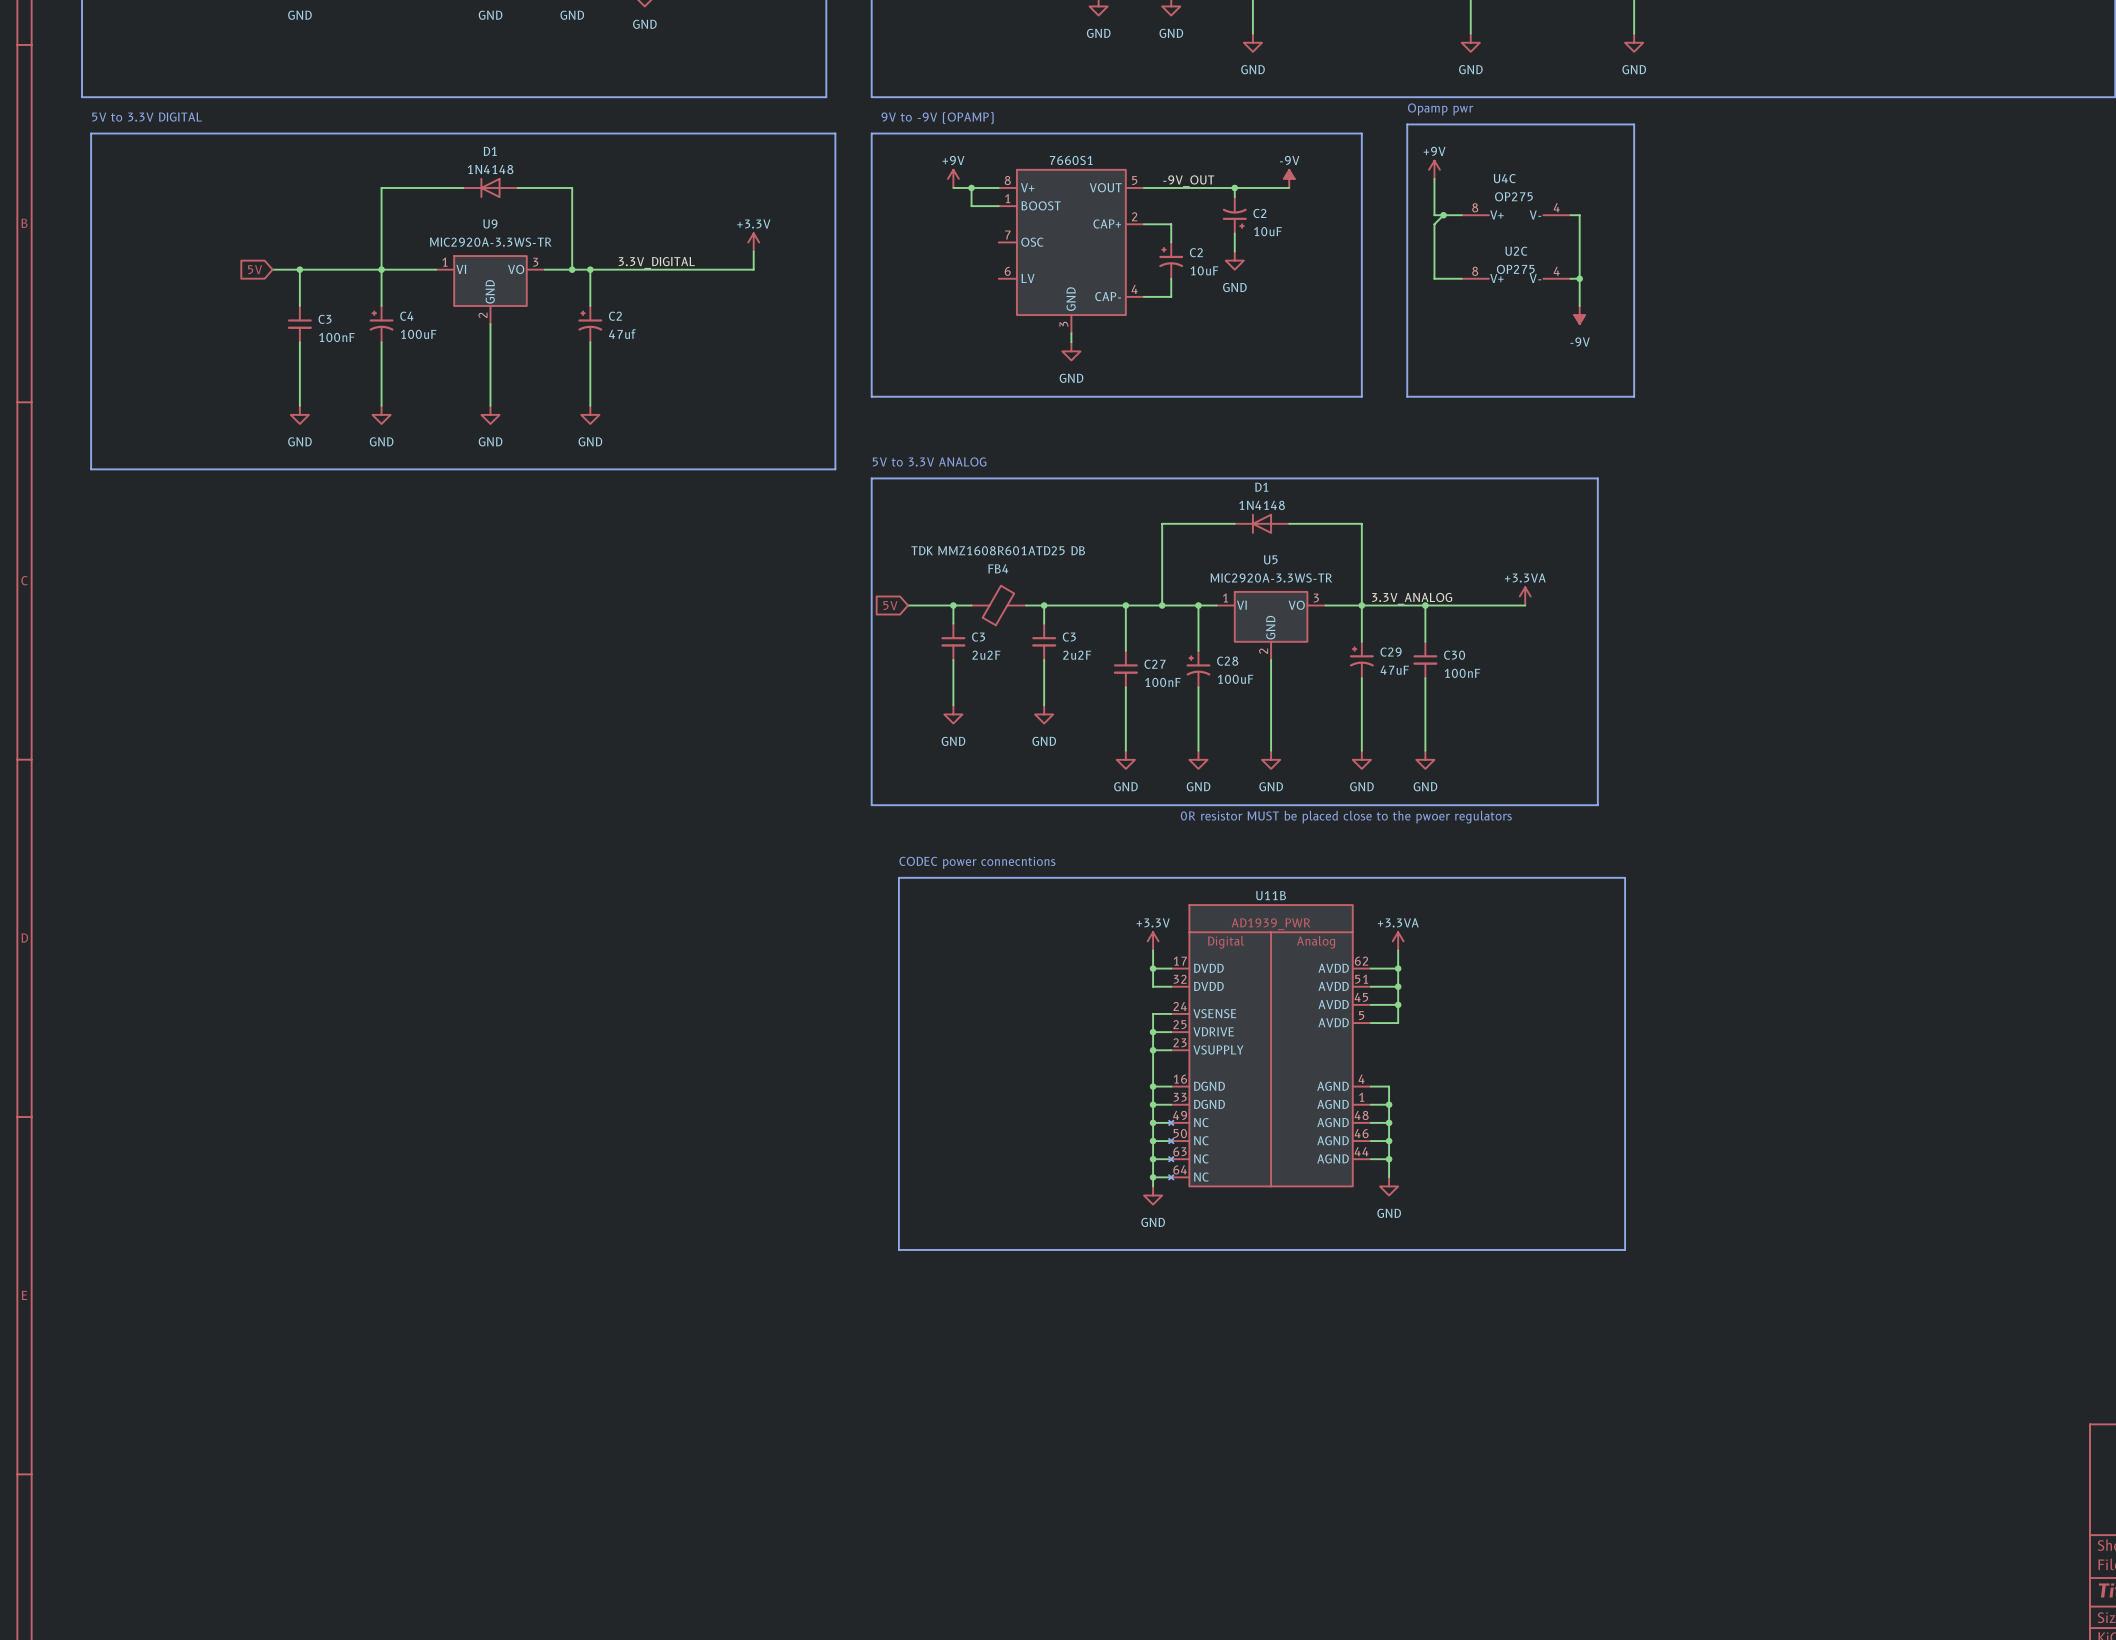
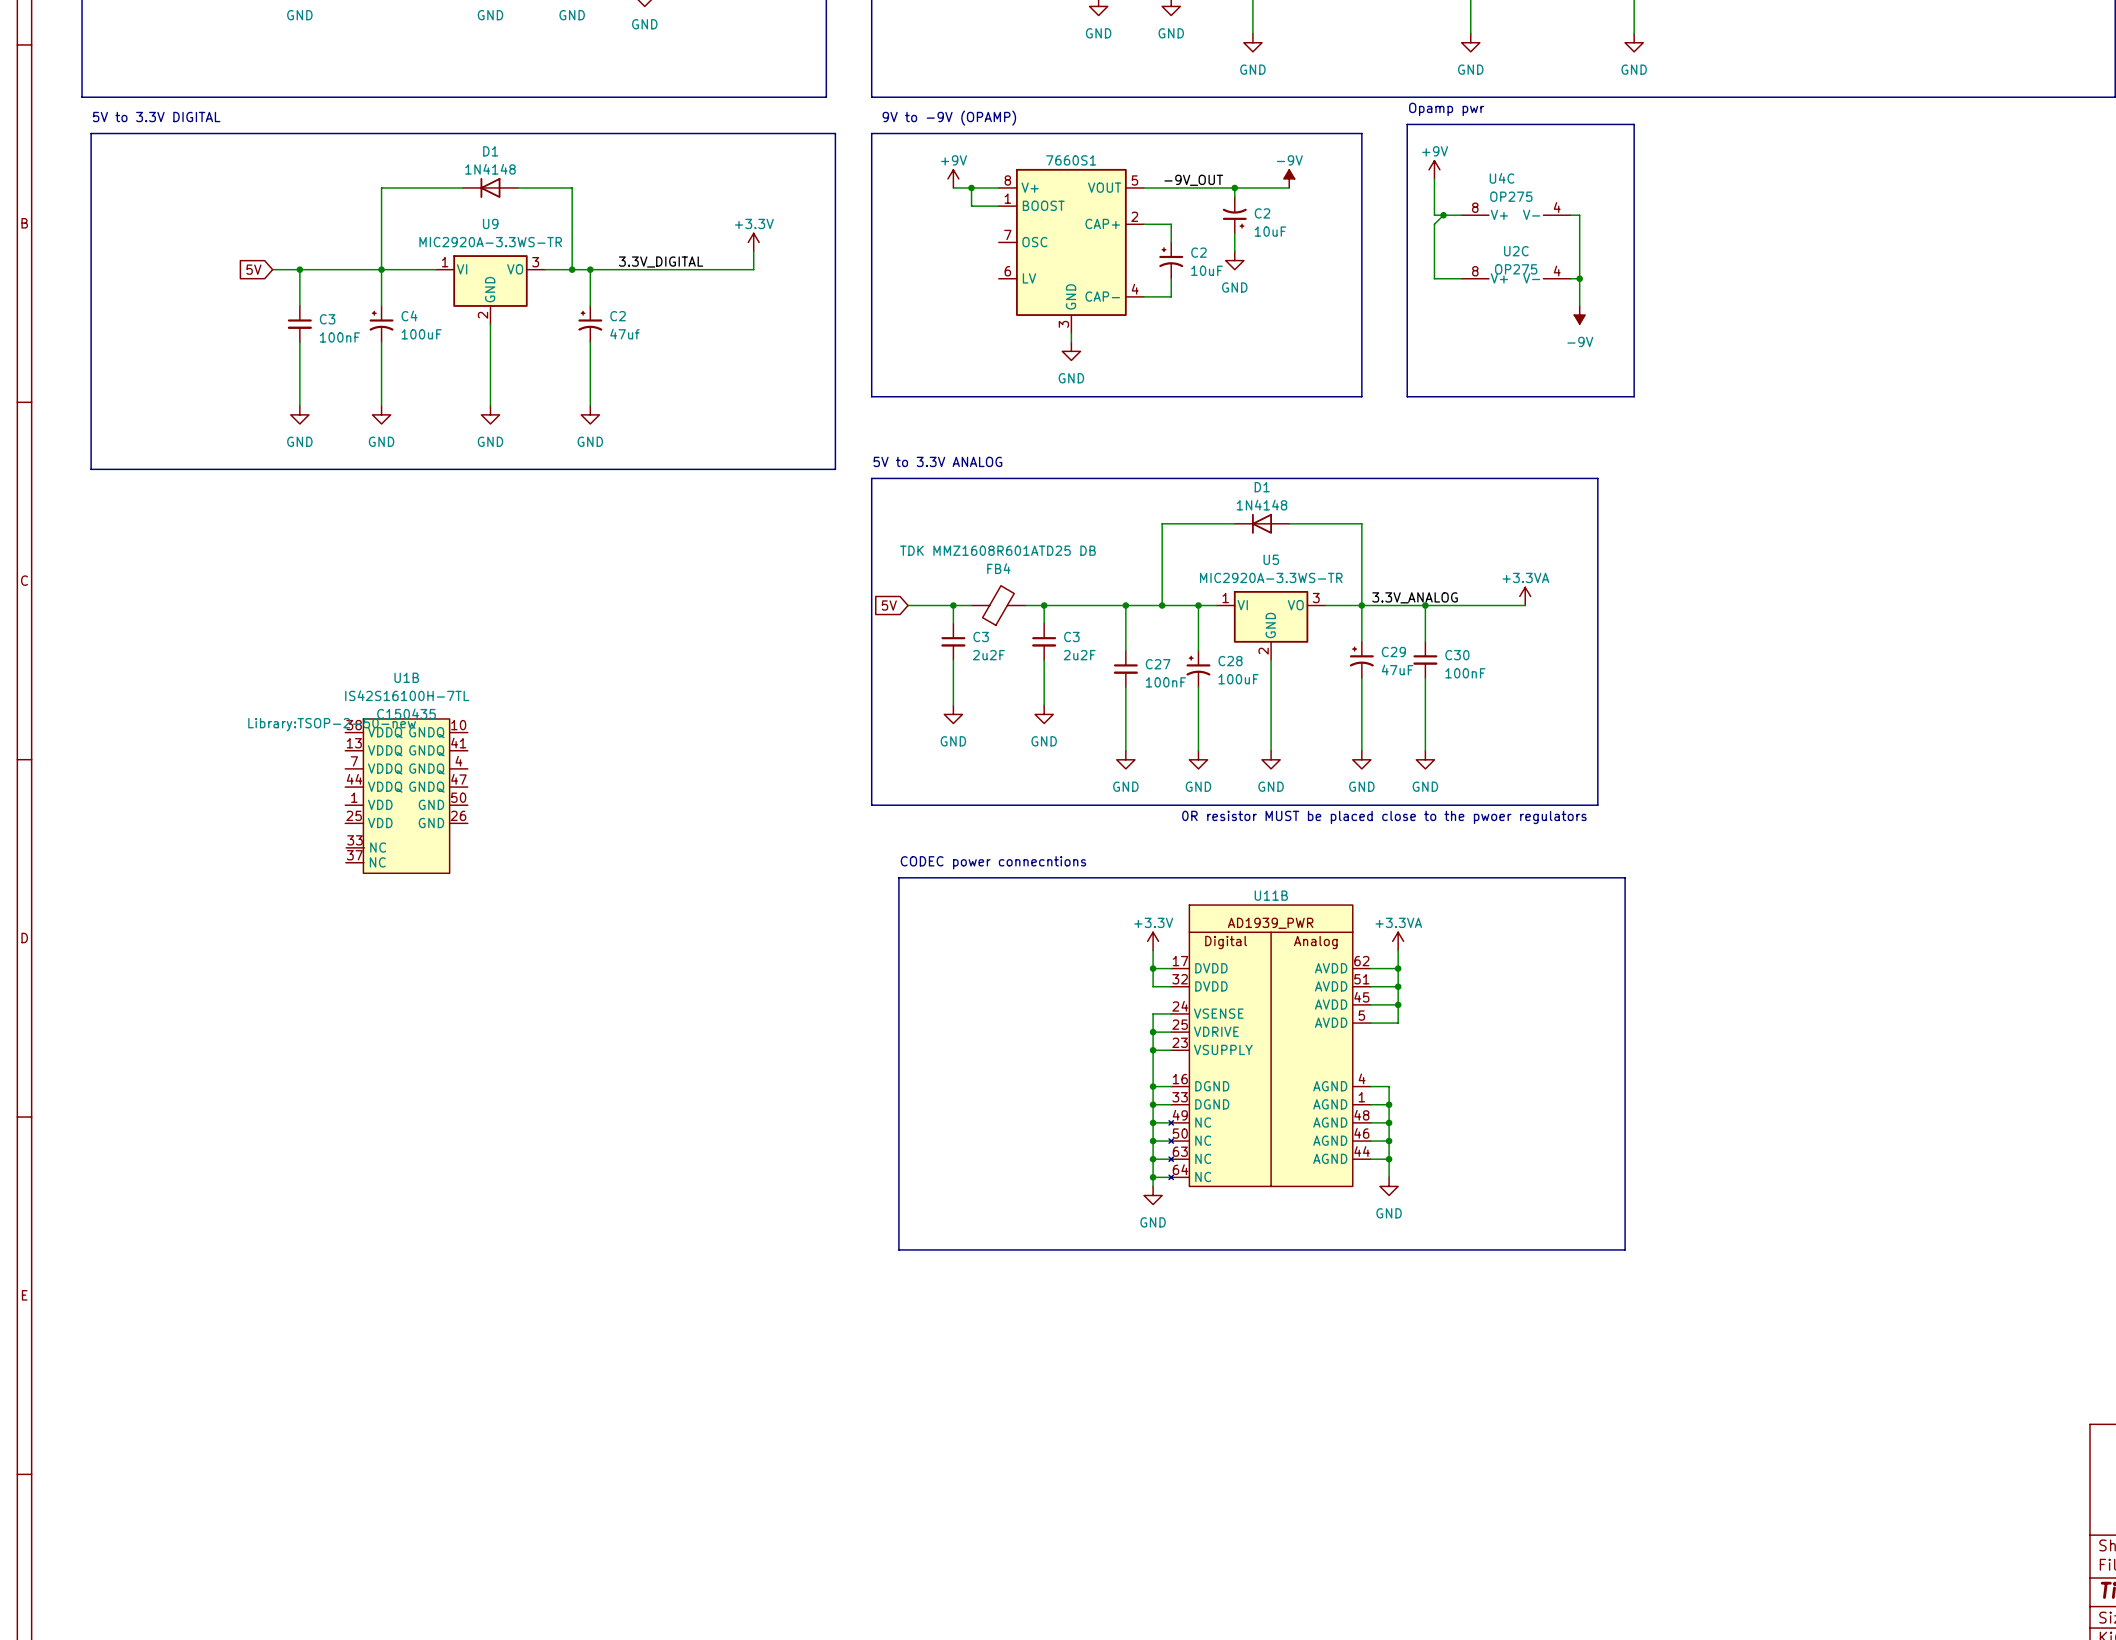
U1B: none -> IS42S16100H-7TL (406, 796)

